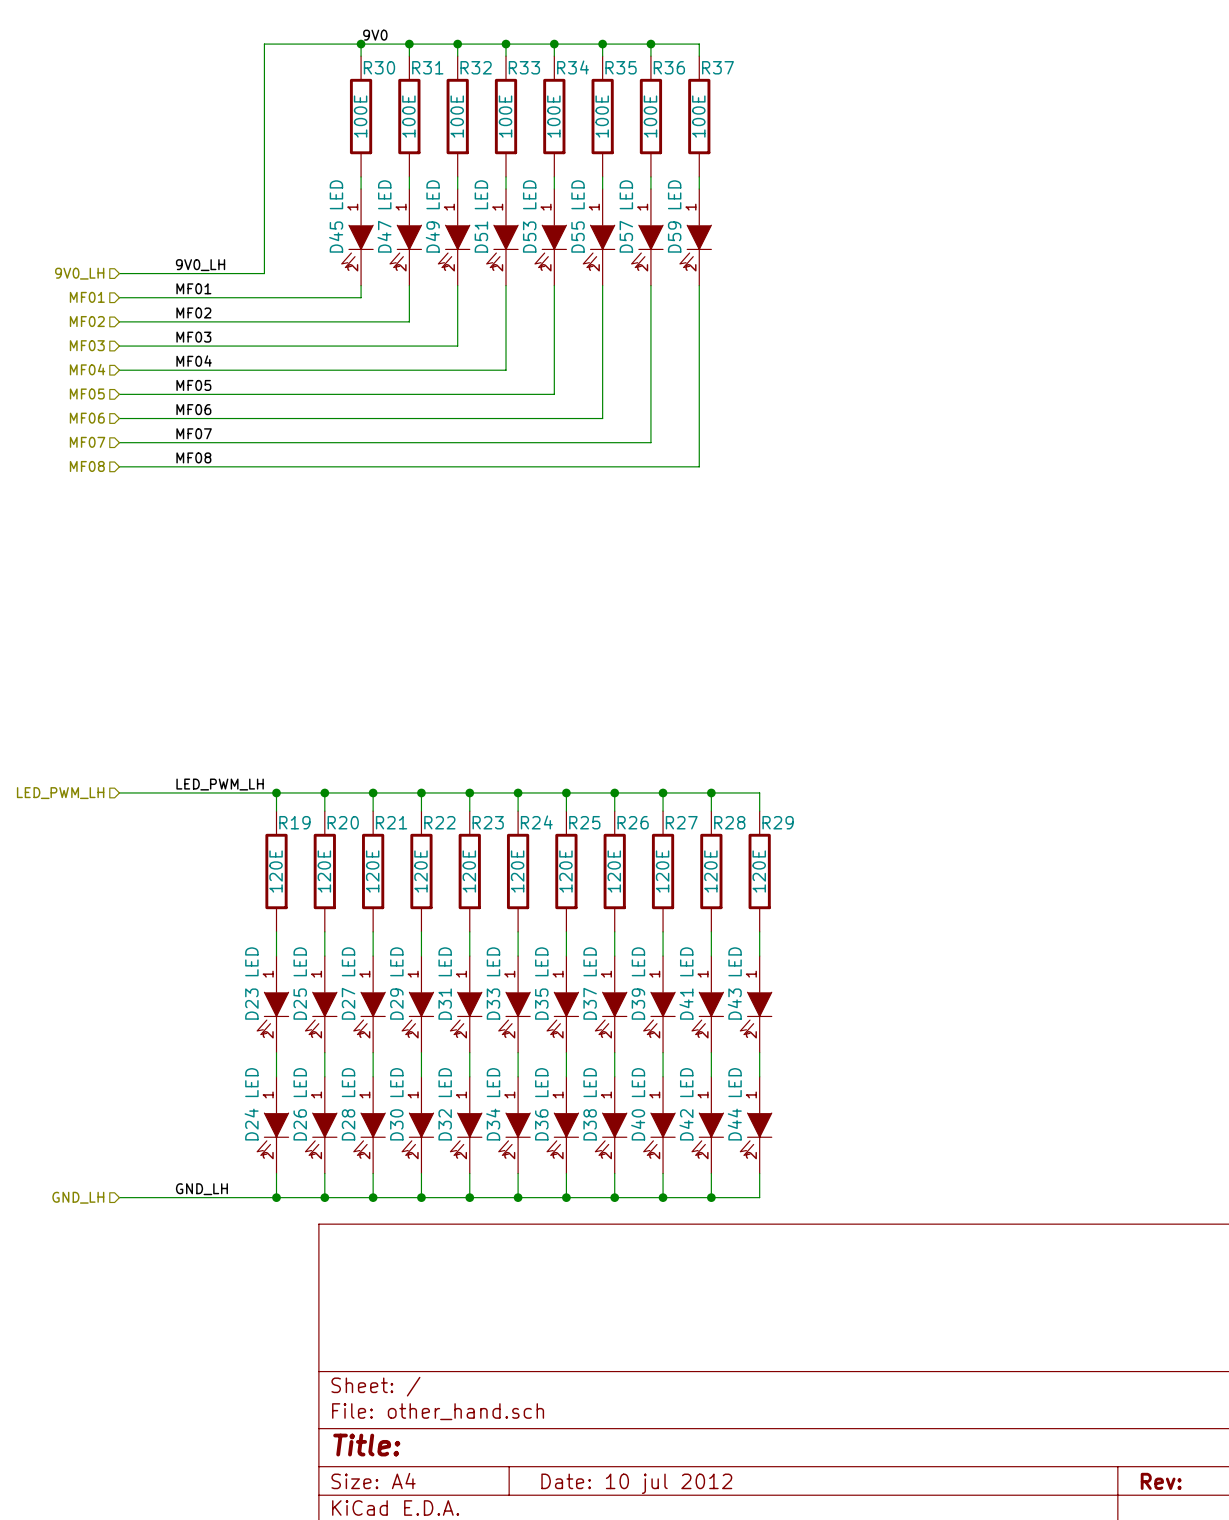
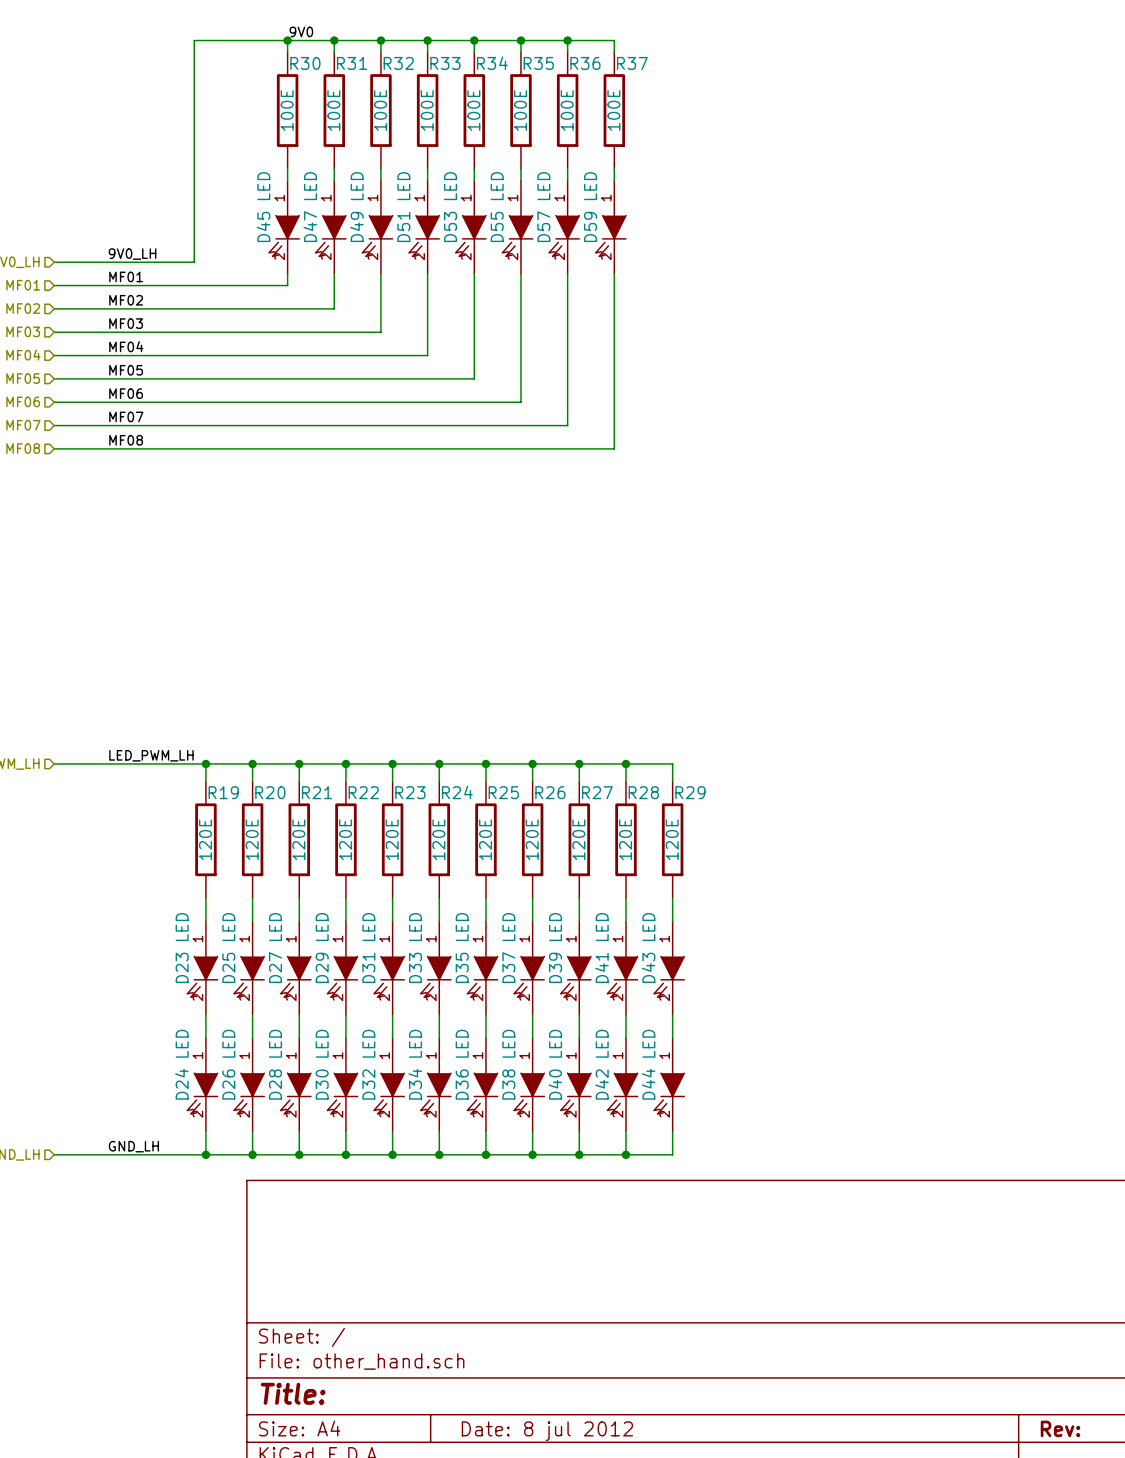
title block: Date: 10 jul 2012 (636, 1483) -> Date: 8 jul 2012 (547, 1431)

